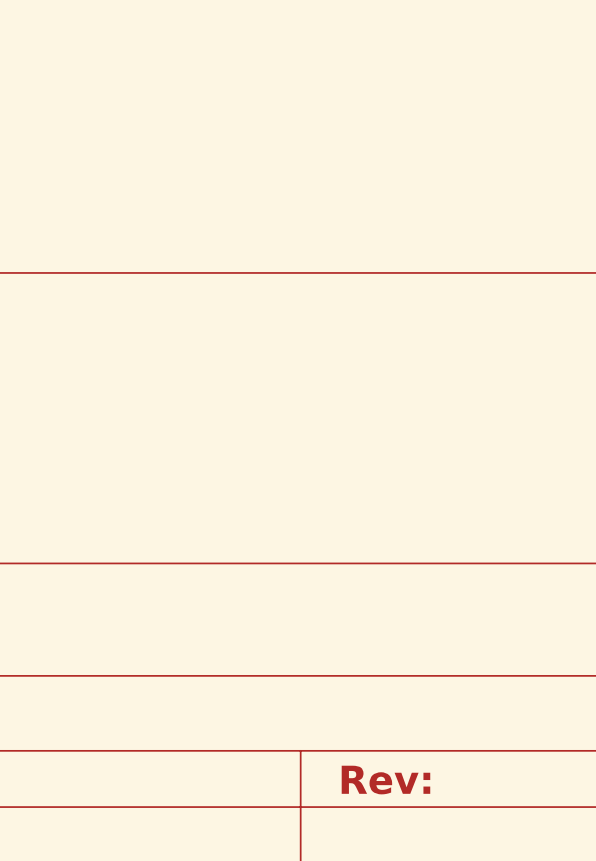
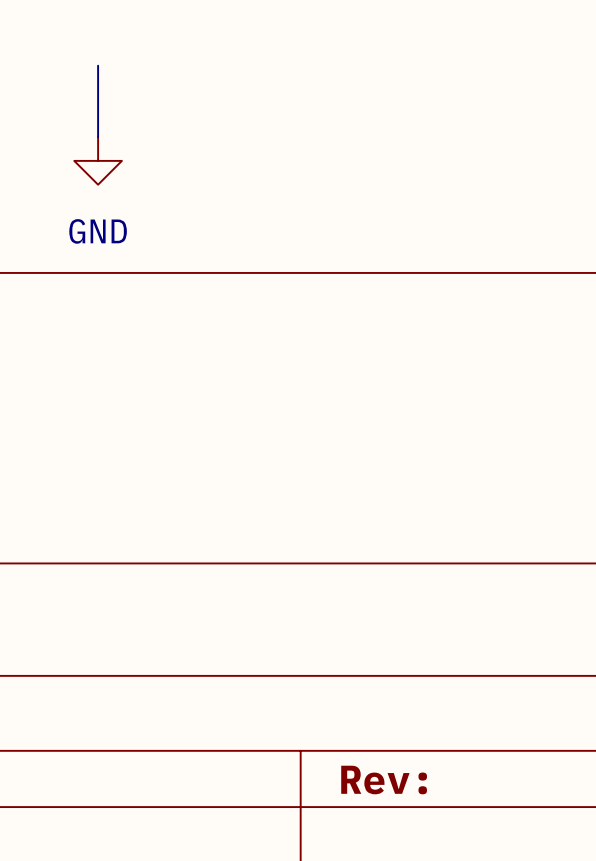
wire: none -> (98, 65) (98, 137)
power symbol: none -> GND (98, 160)

